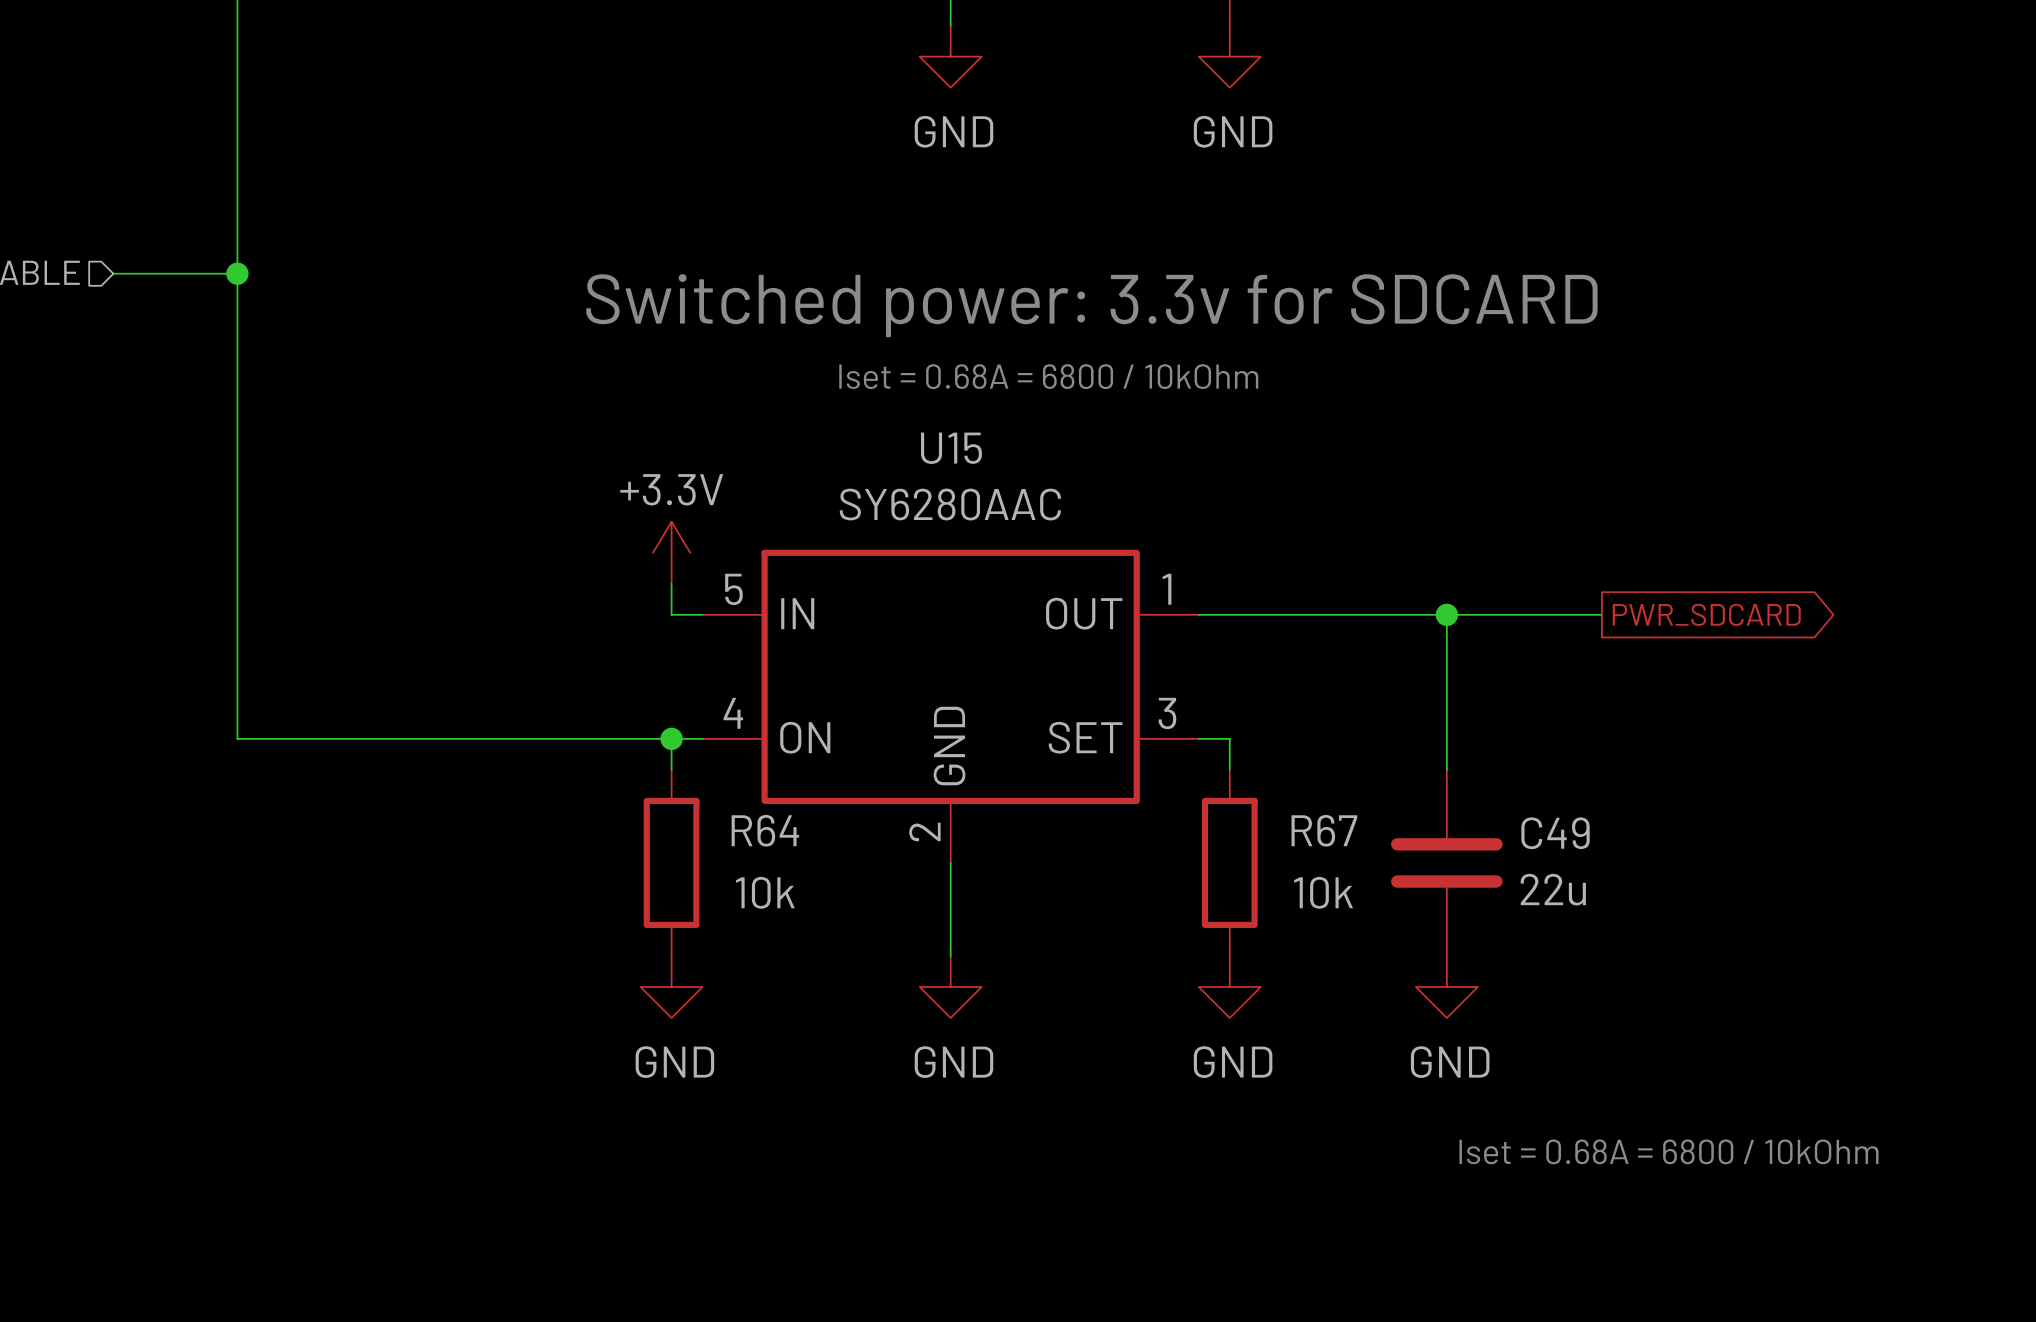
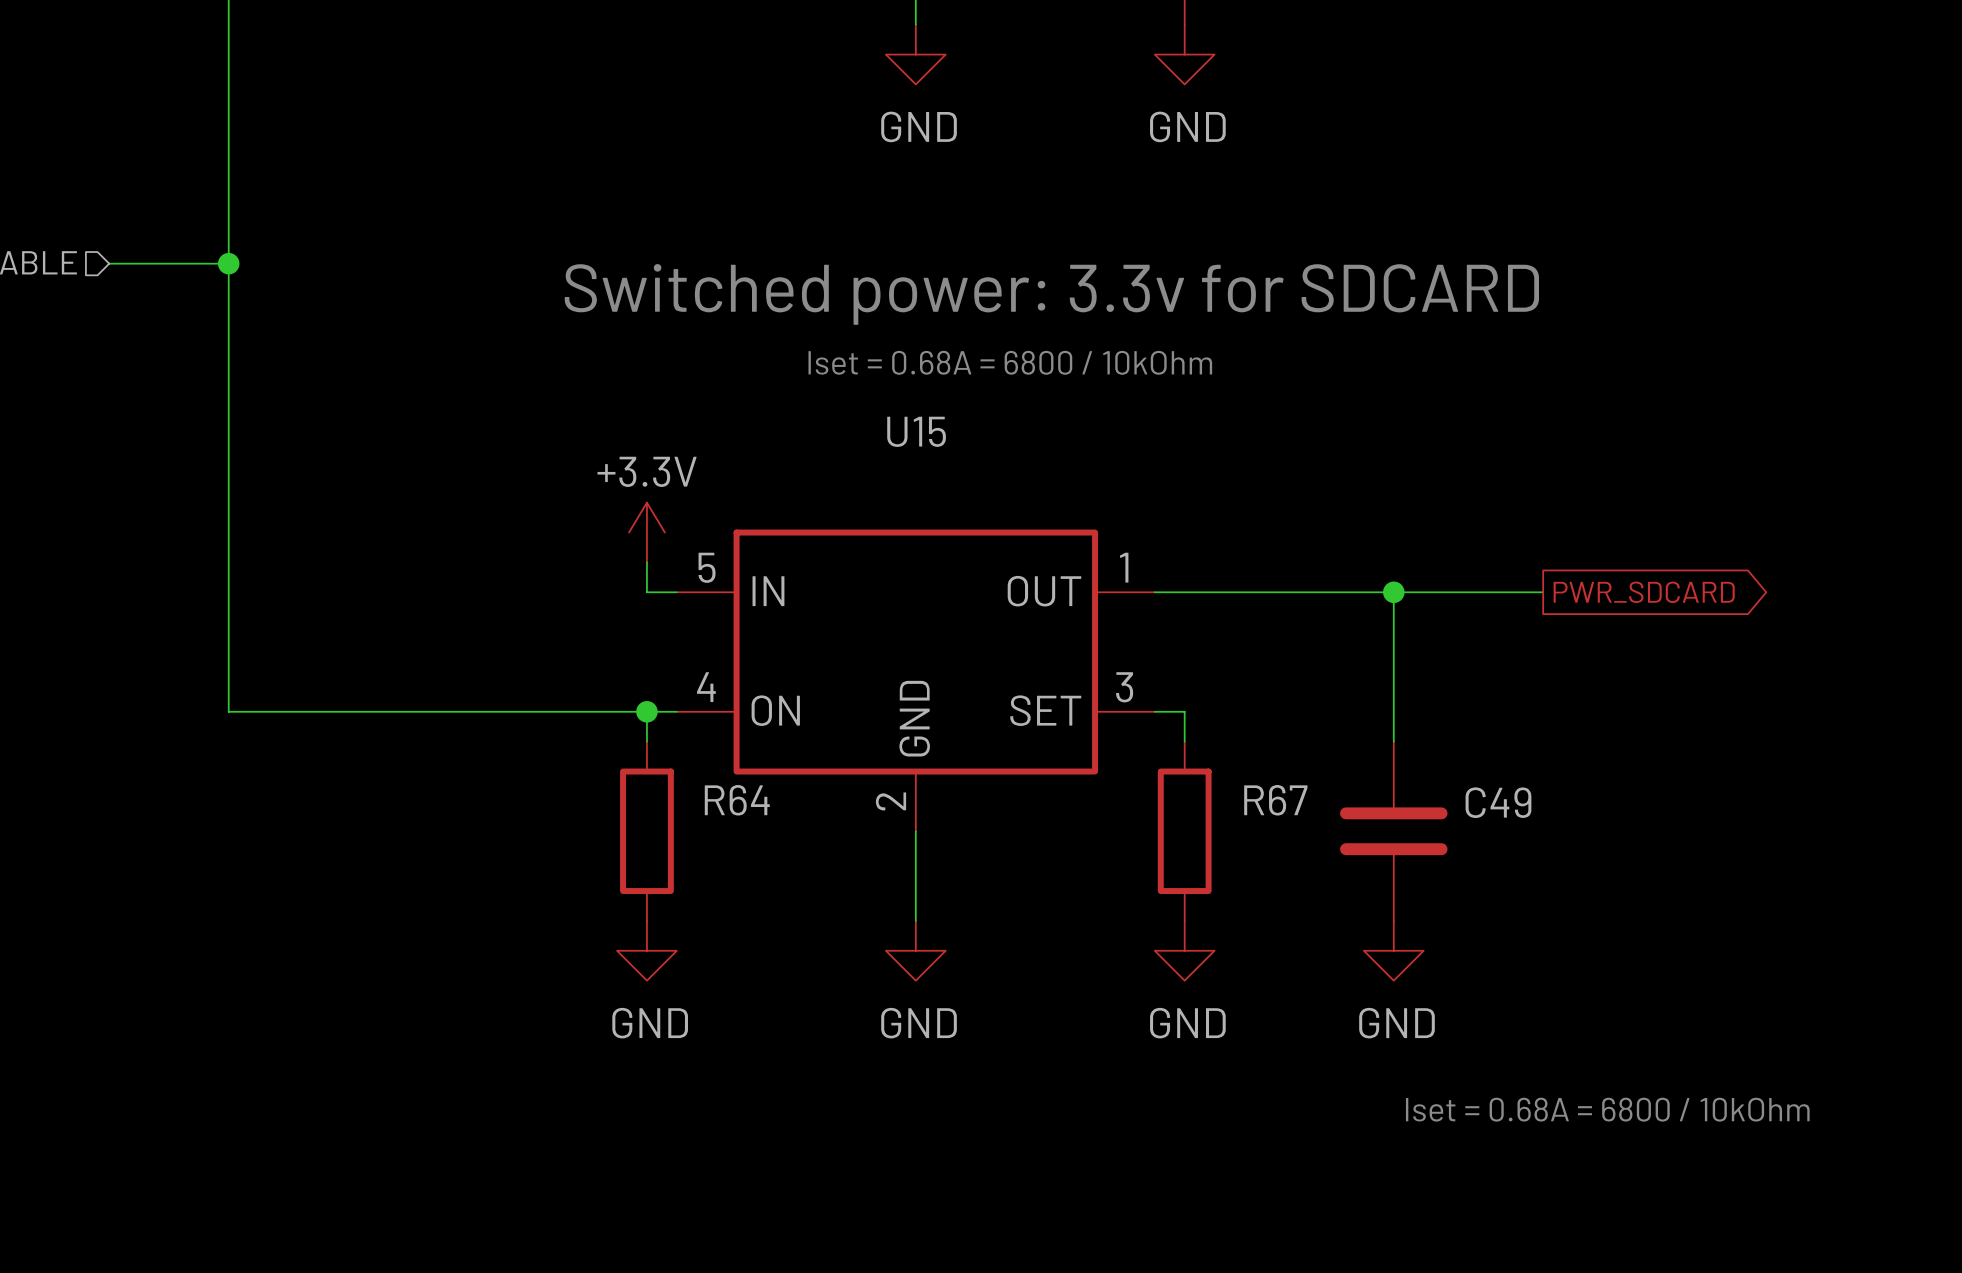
U15 value: SY6280AAC (950, 504) -> none
C49 value: 22u (1553, 889) -> none
R64 value: 10k (765, 892) -> none
R67 value: 10k (1323, 892) -> none

